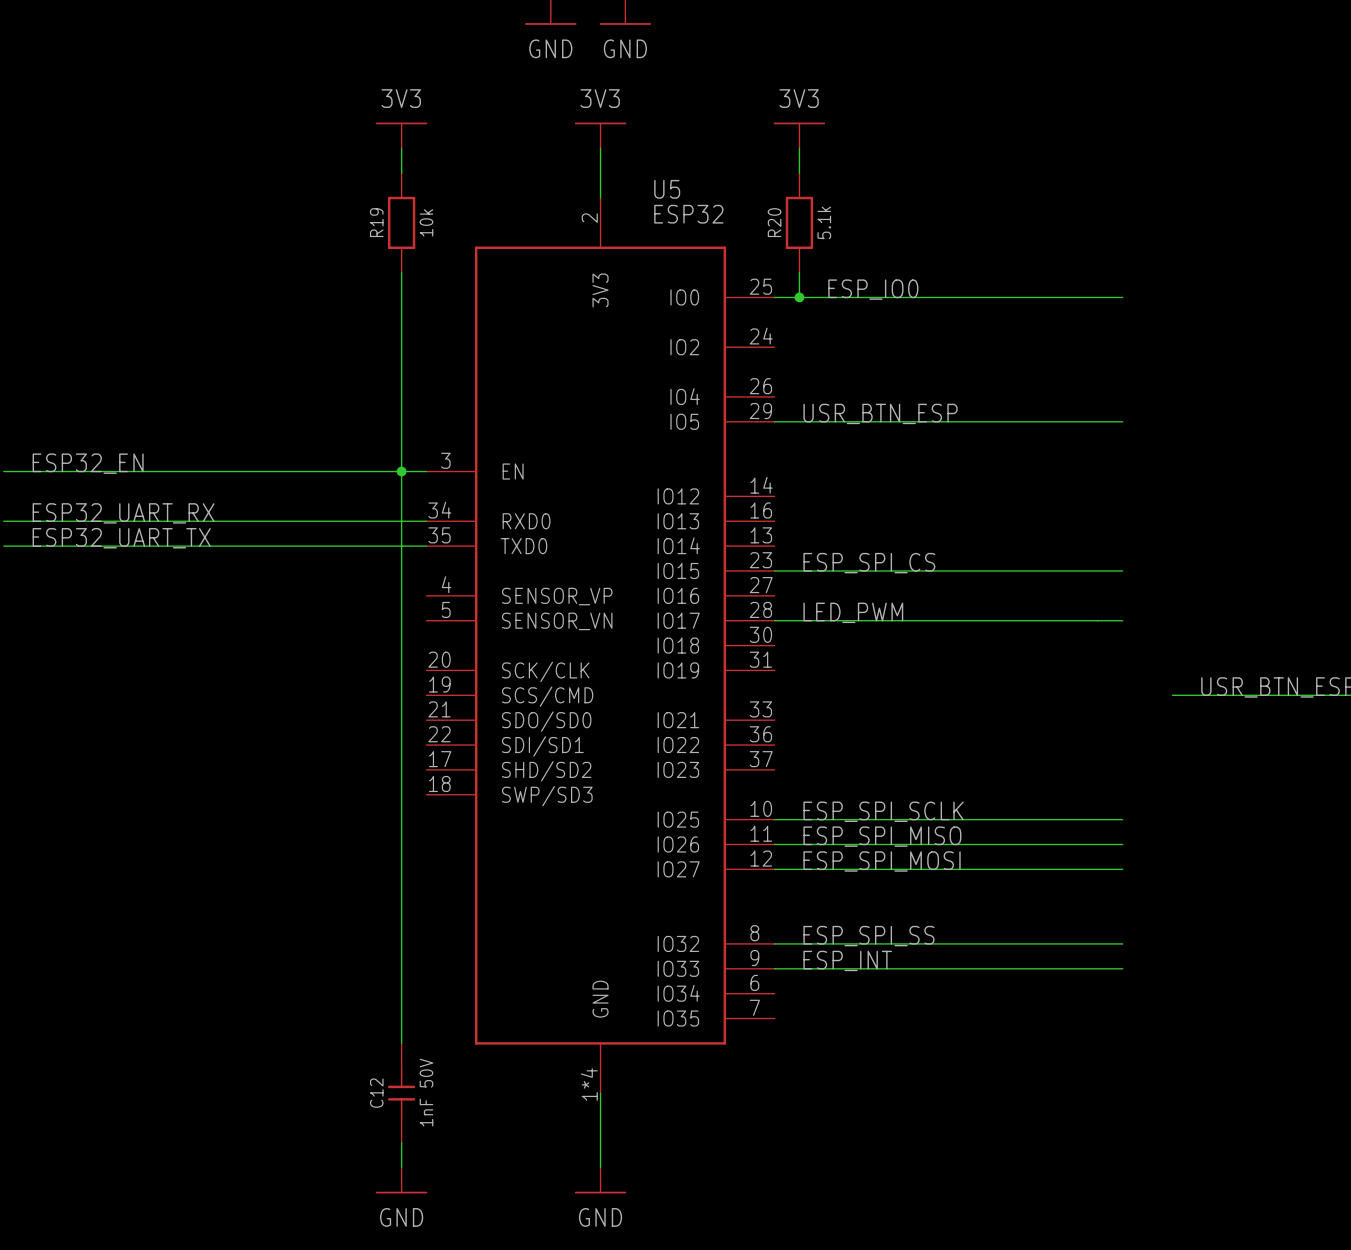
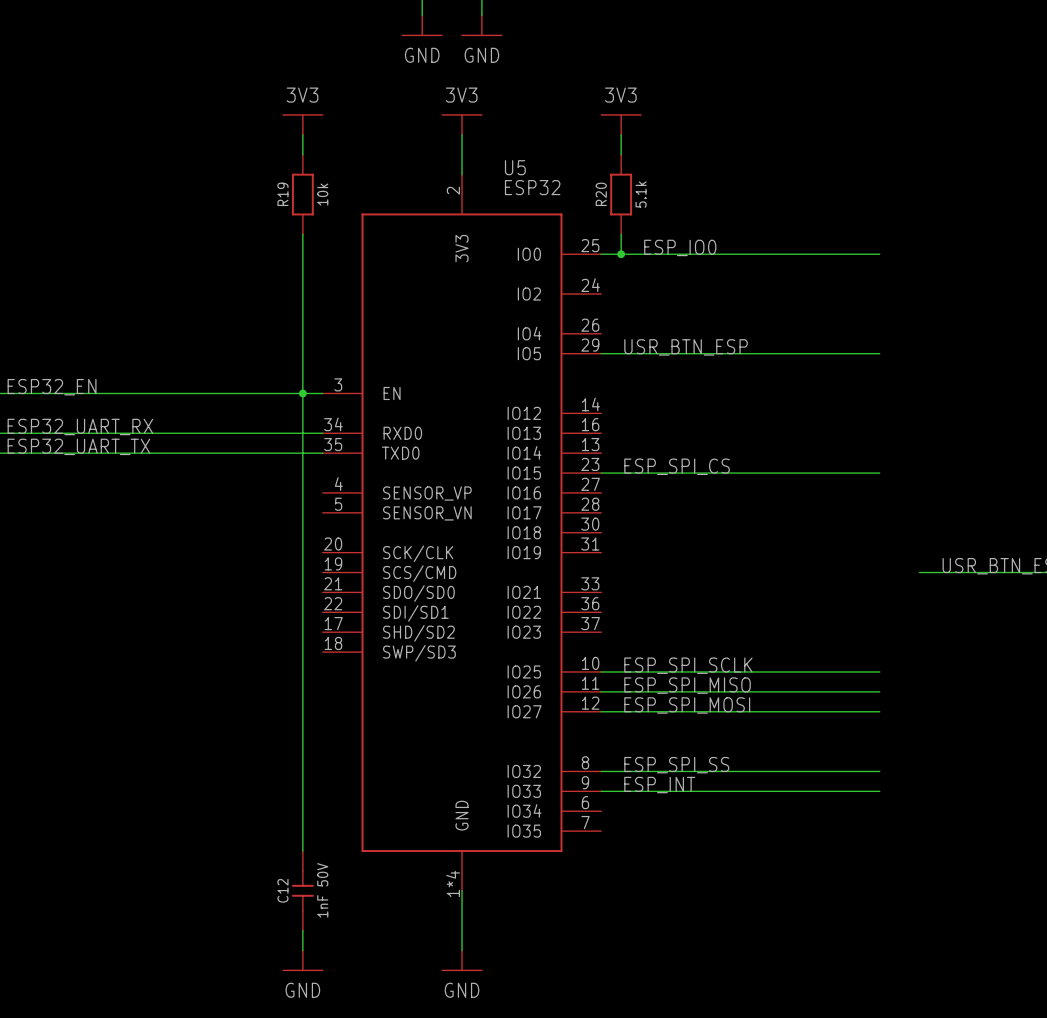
label: LED_PWM (853, 612) -> none
wire: (774, 620) (1122, 620) -> none

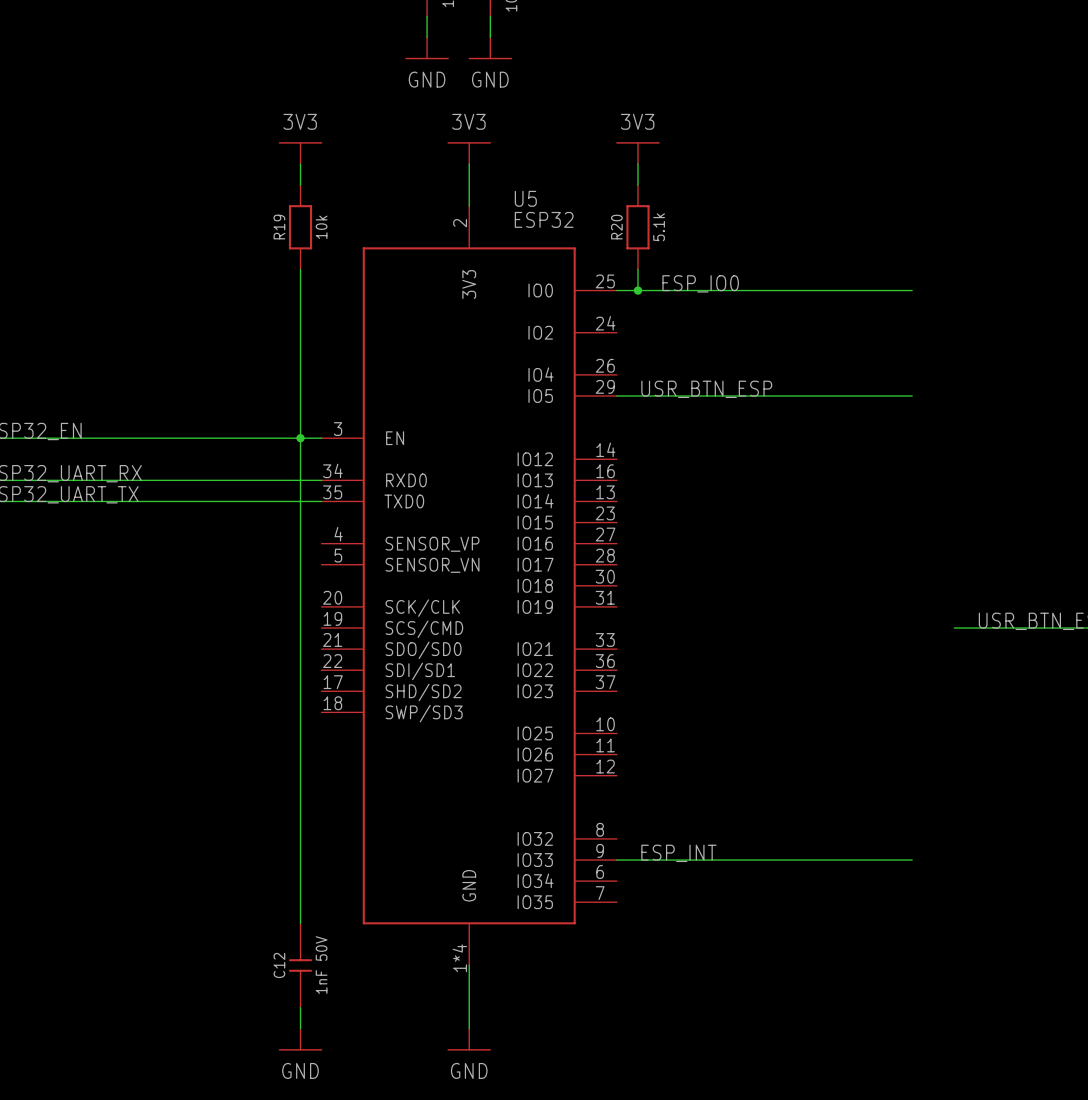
label: ESP_SPI_CS (677, 466) -> none
wire: (601, 473) (879, 473) -> none
label: ESP_SPI_SCLK (688, 665) -> none
wire: (601, 671) (879, 671) -> none
label: ESP_SPI_MISO (687, 685) -> none
wire: (601, 691) (879, 691) -> none
label: ESP_SPI_MOSI (687, 705) -> none
wire: (601, 711) (879, 711) -> none
label: ESP_SPI_SS (676, 765) -> none
wire: (601, 771) (879, 771) -> none

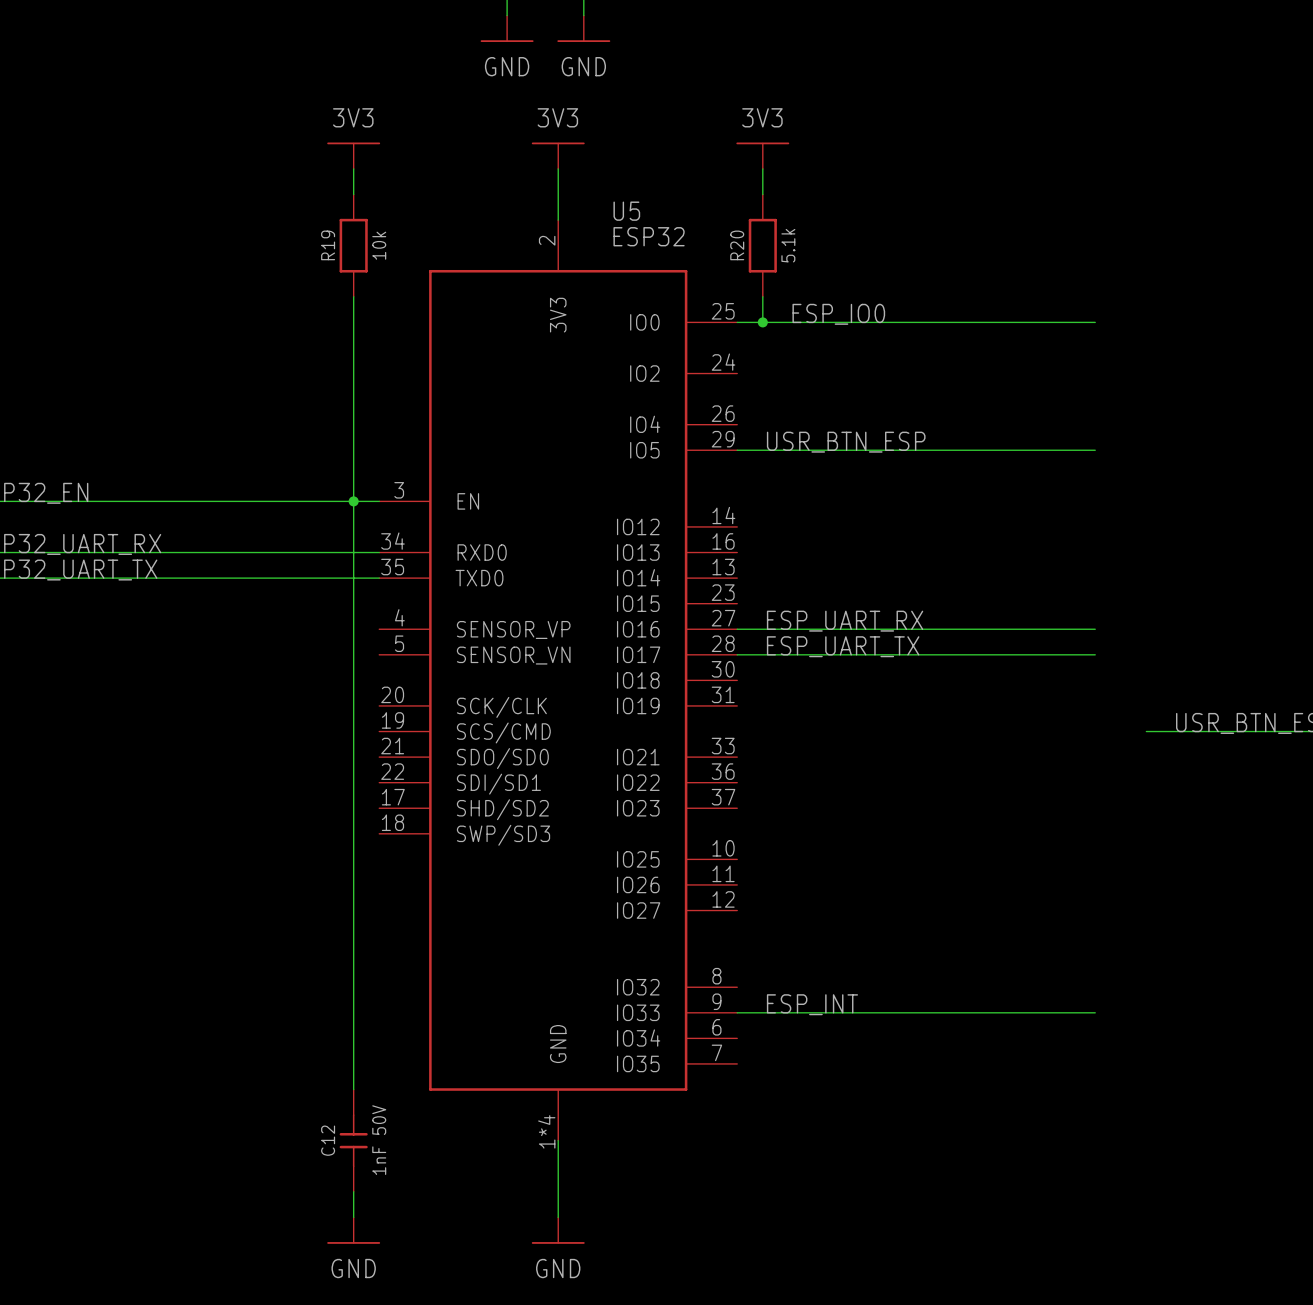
label: none -> ESP_UART_RX (845, 621)
wire: none -> (737, 629) (1095, 629)
label: none -> ESP_UART_TX (843, 646)
wire: none -> (737, 654) (1095, 654)

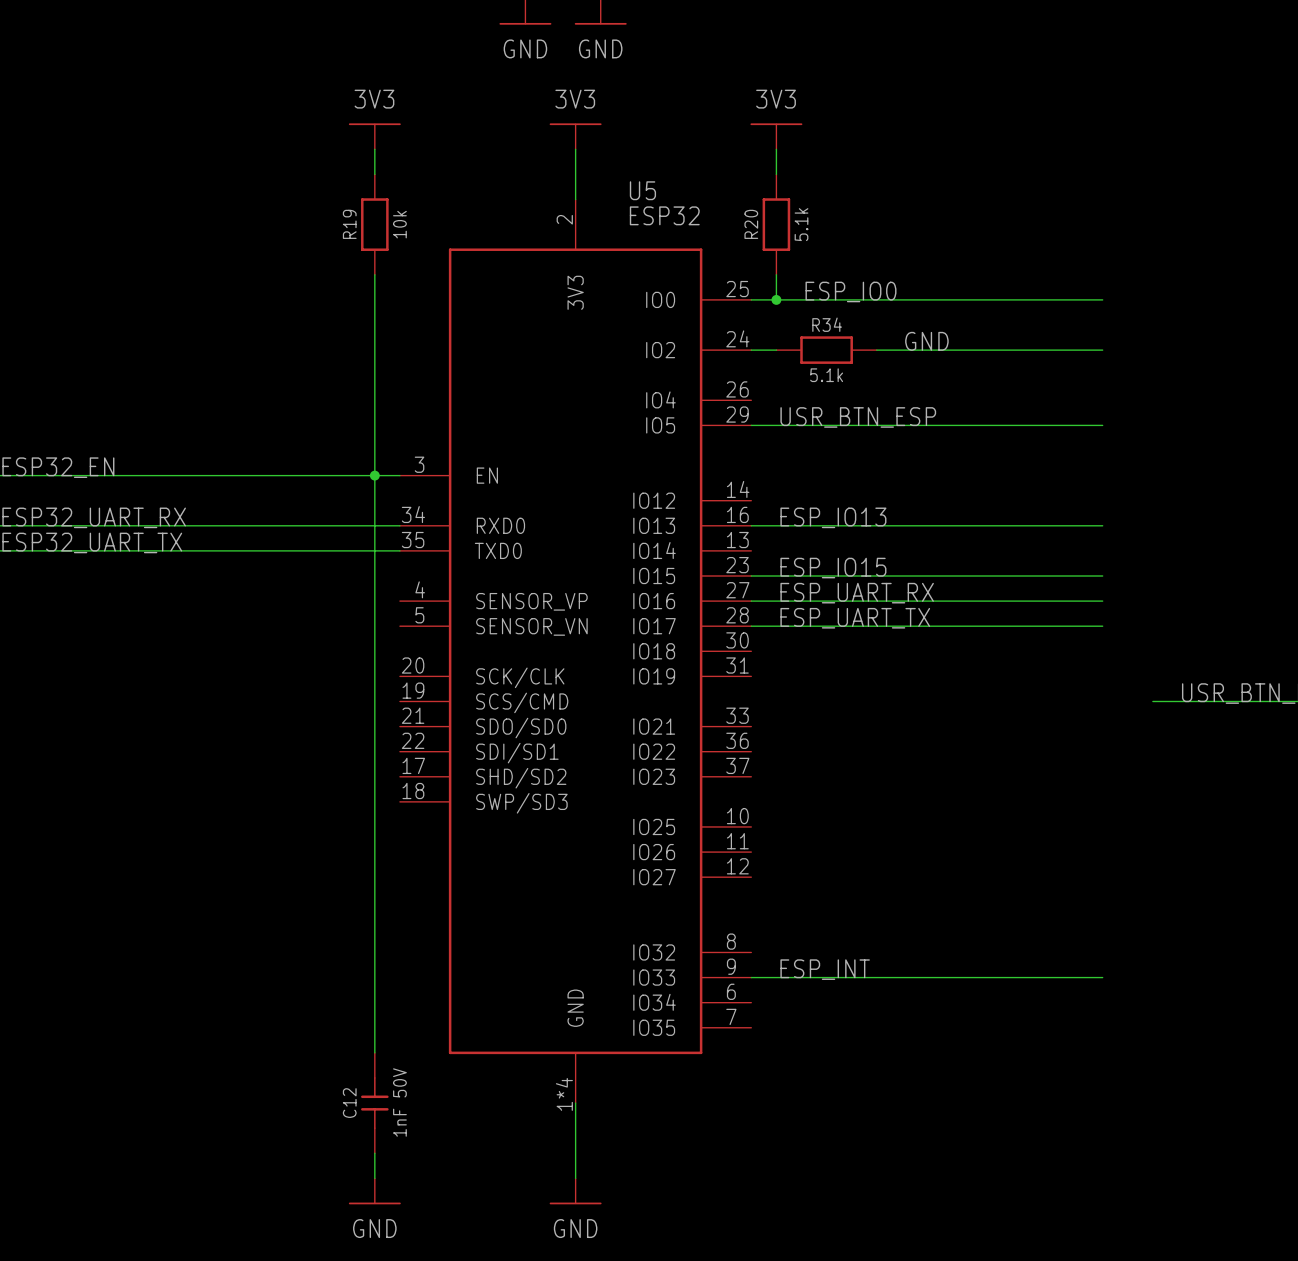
label: none -> GND (926, 341)
wire: none -> (751, 350) (776, 350)
R34: none -> 5.1k (826, 350)
wire: none -> (876, 350) (1102, 350)
label: none -> ESP_IO13 (833, 517)
wire: none -> (751, 525) (1102, 525)
label: none -> ESP_IO15 (833, 568)
wire: none -> (751, 575) (1102, 575)

